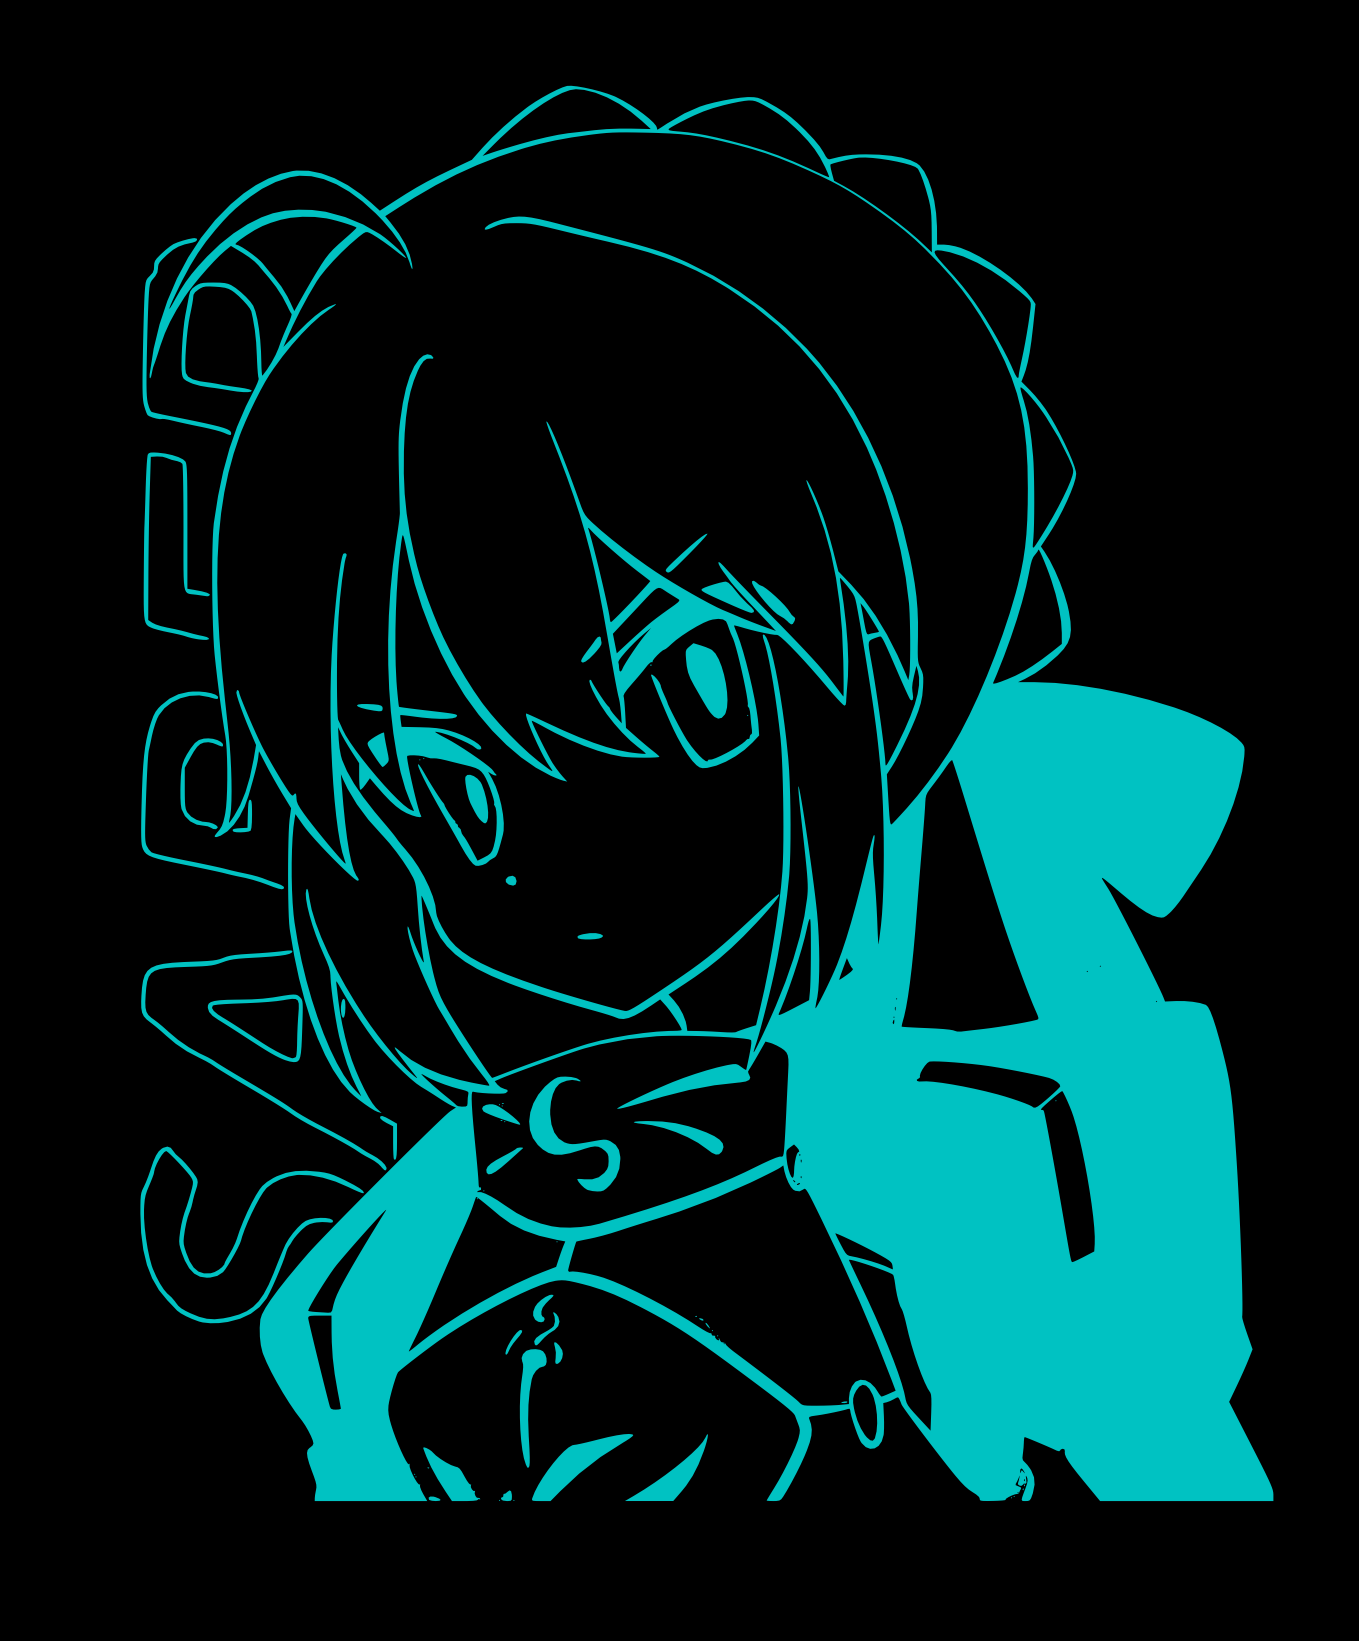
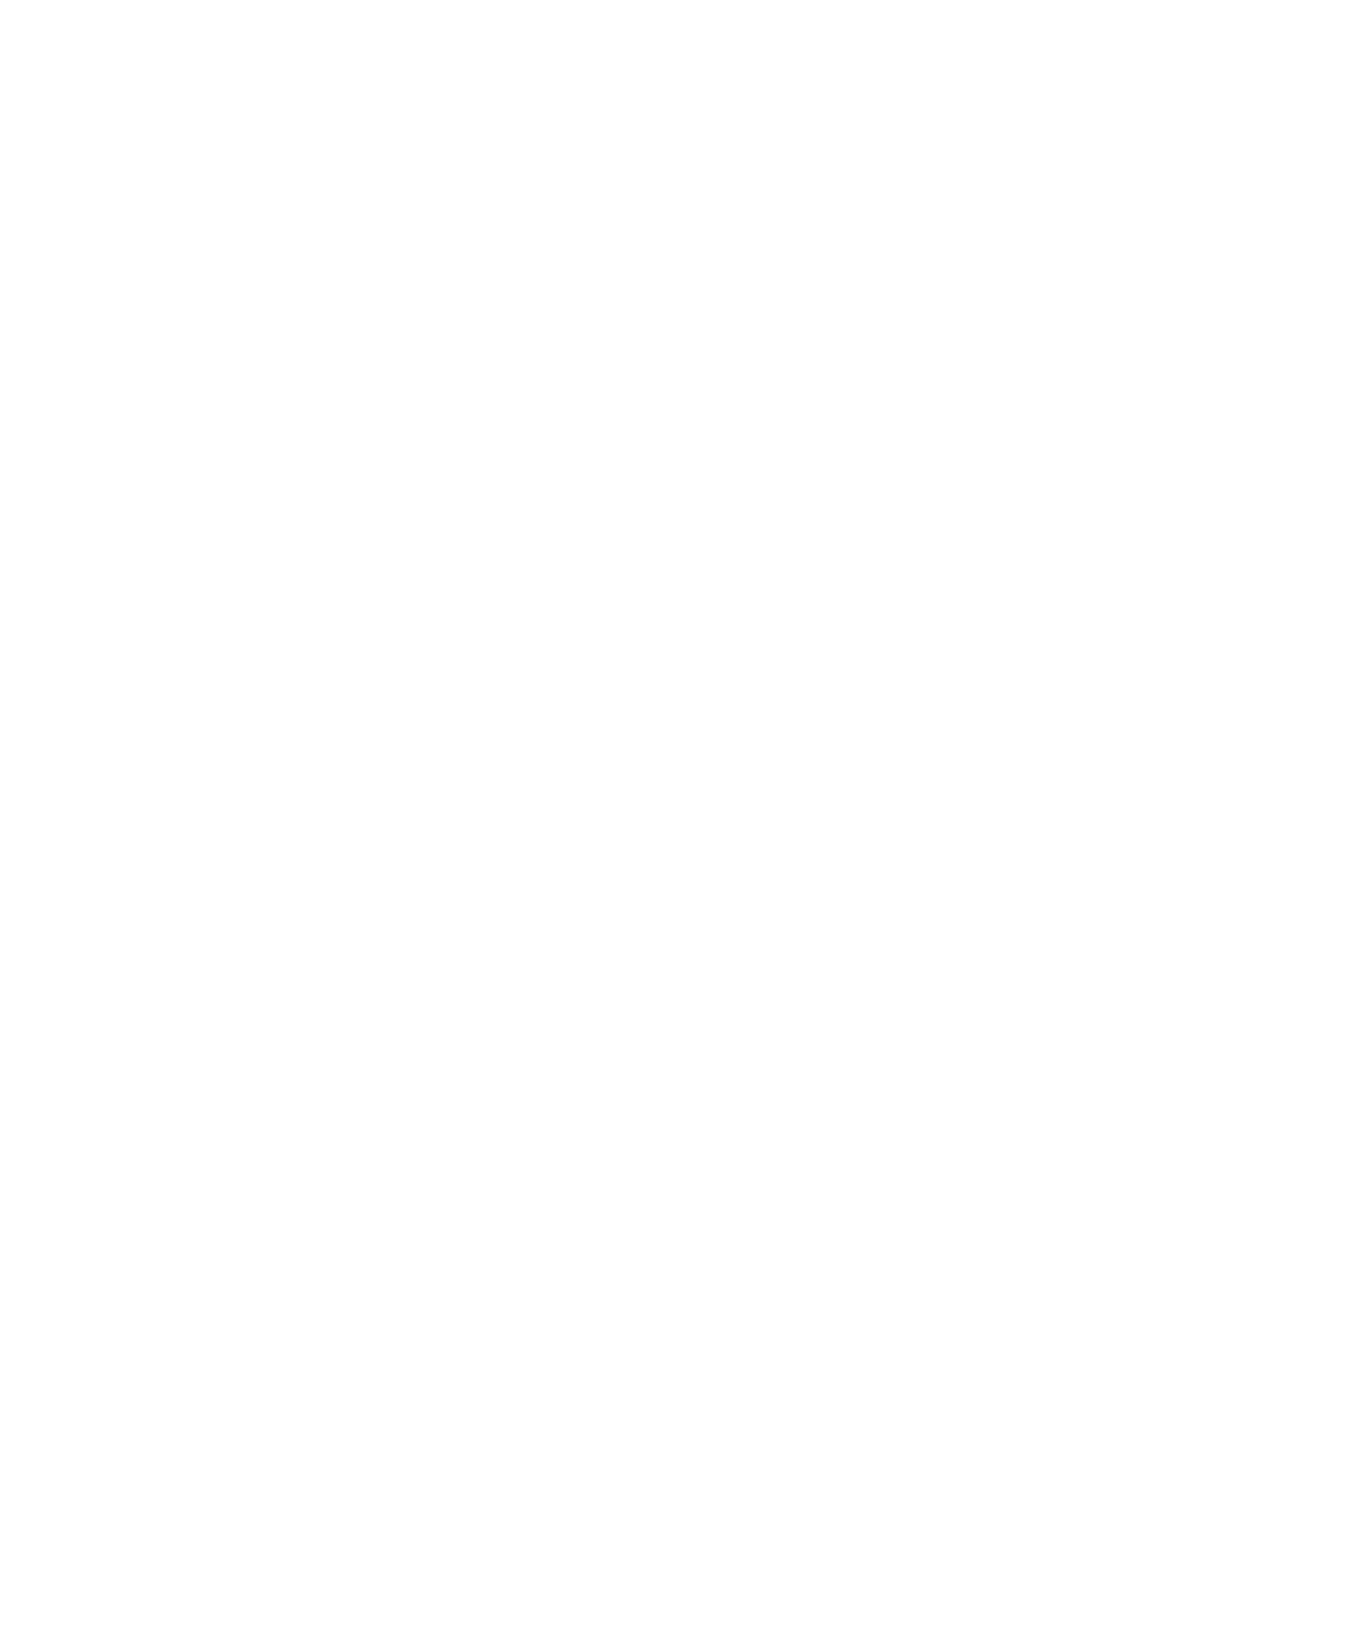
drawing: [140, 85, 1274, 1502] -> none

